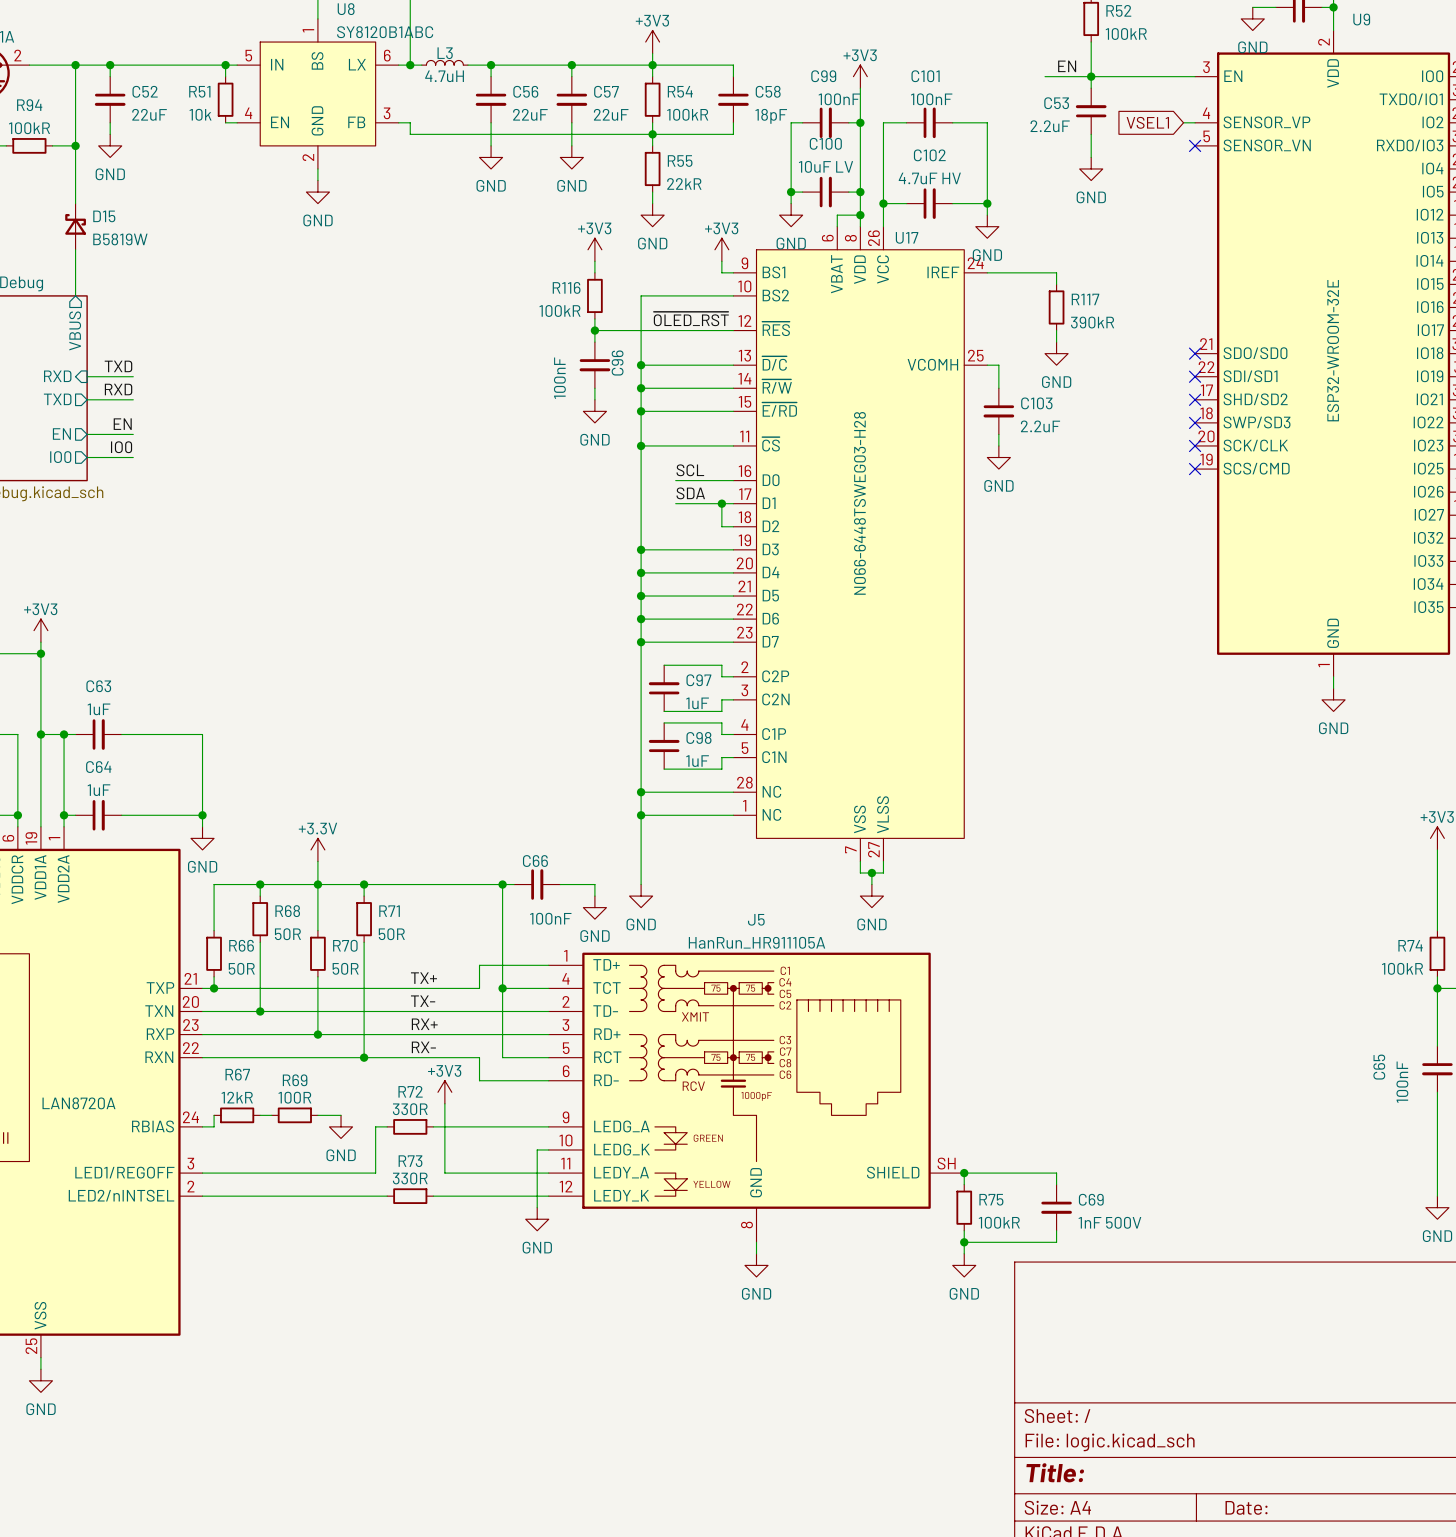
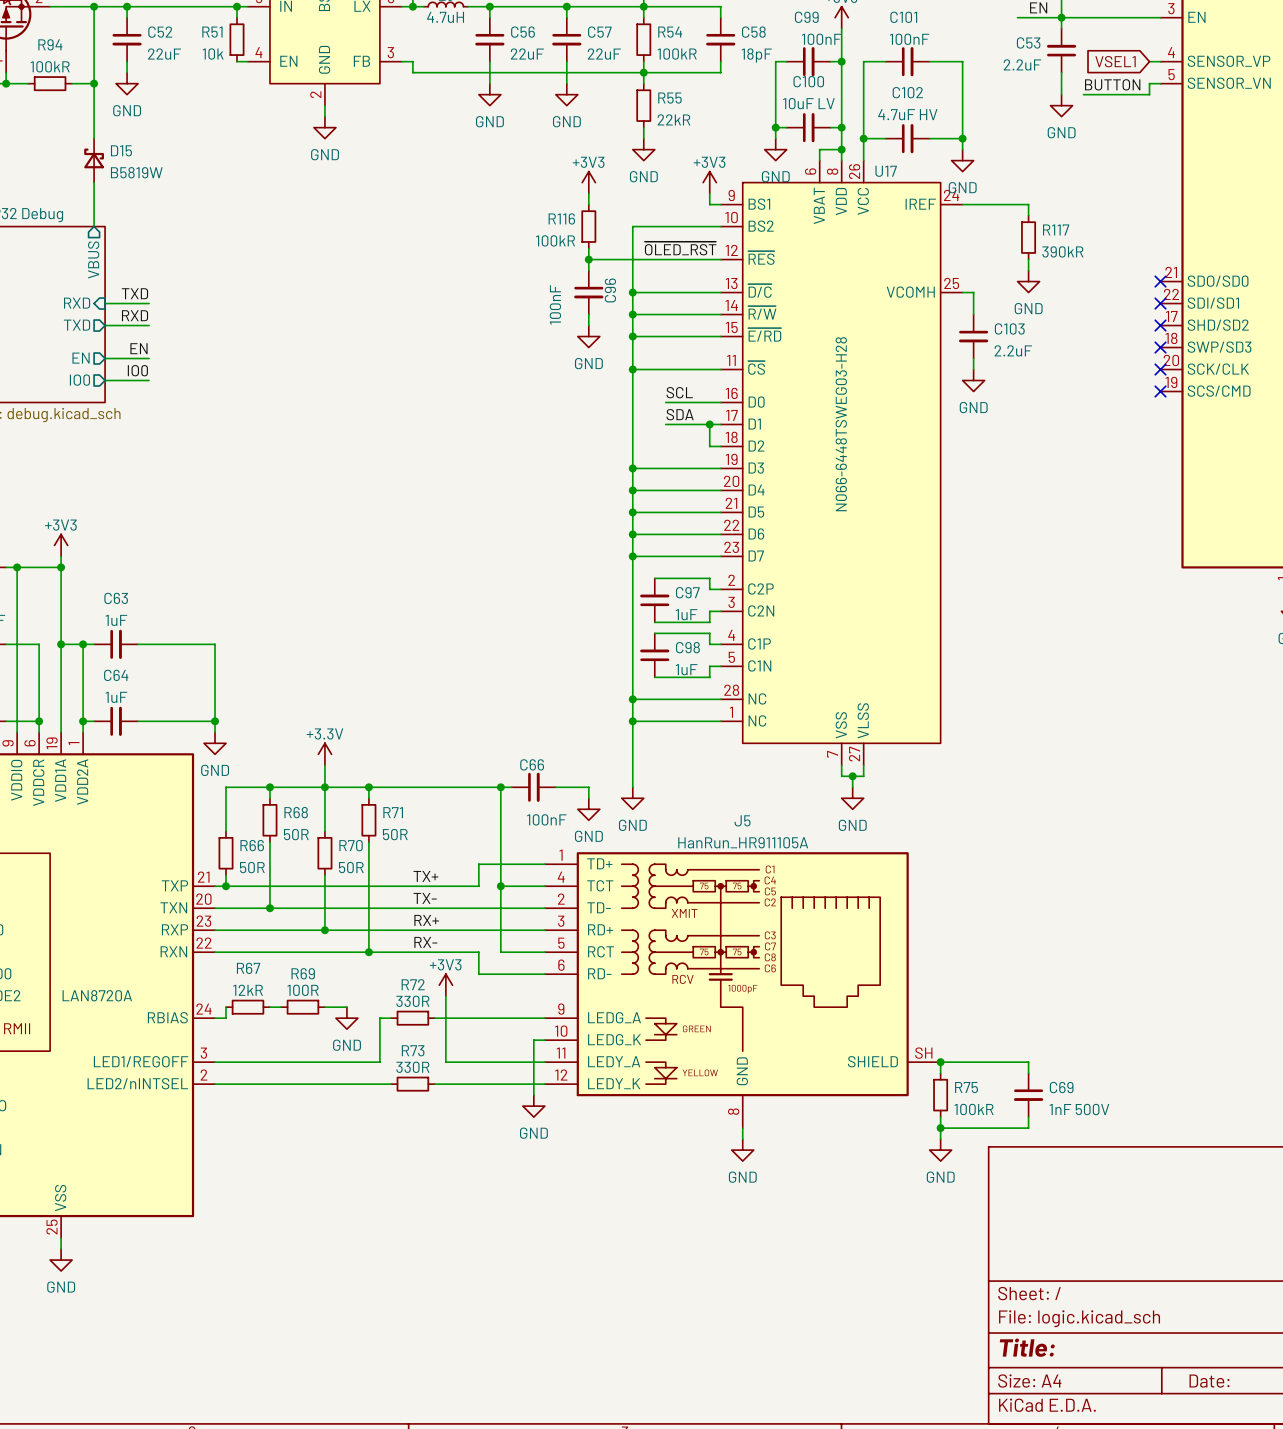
wire: none -> (1160, 83) (1149, 83) (1149, 94) (1083, 94)
no-connect mark: (1195, 145) -> none
label: none -> BUTTON (1112, 84)

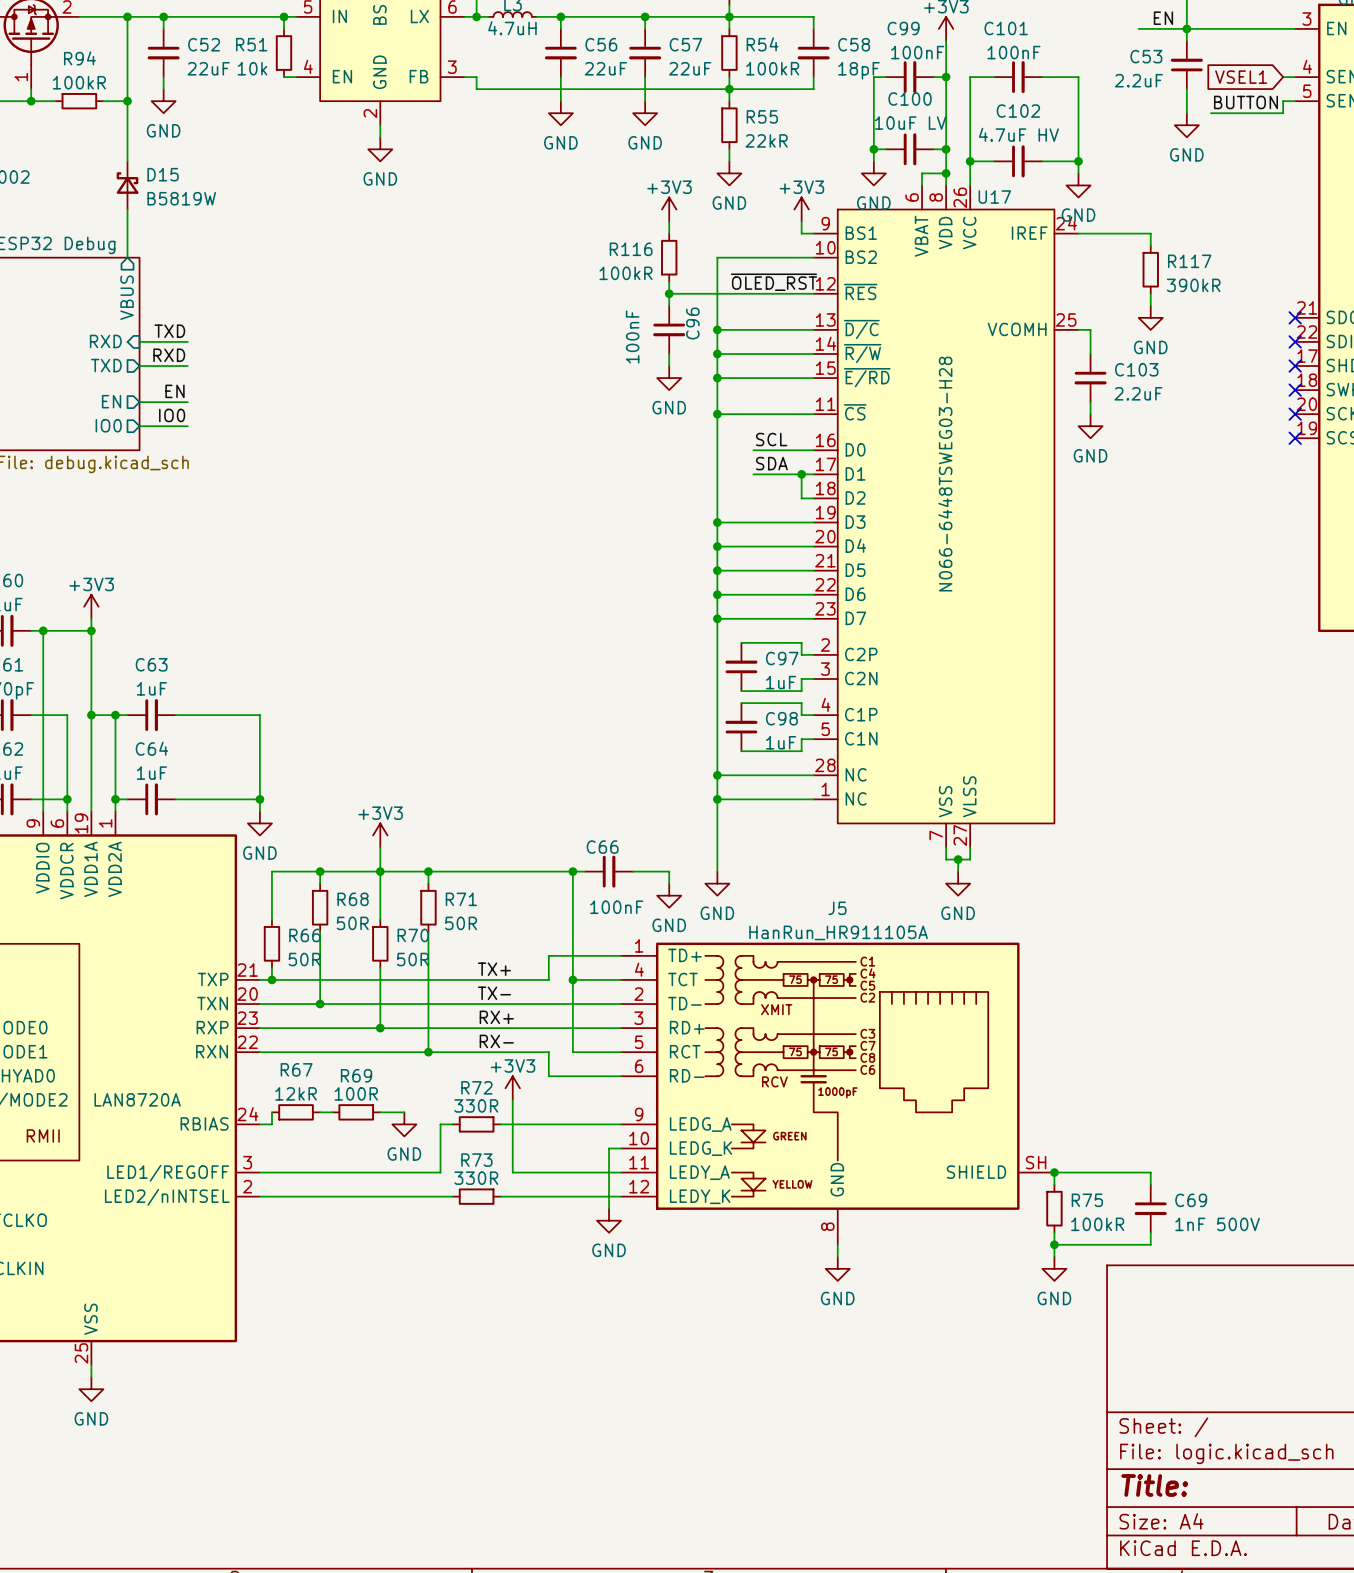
power symbol: +3.3V (324, 754) -> +3V3 (380, 835)

